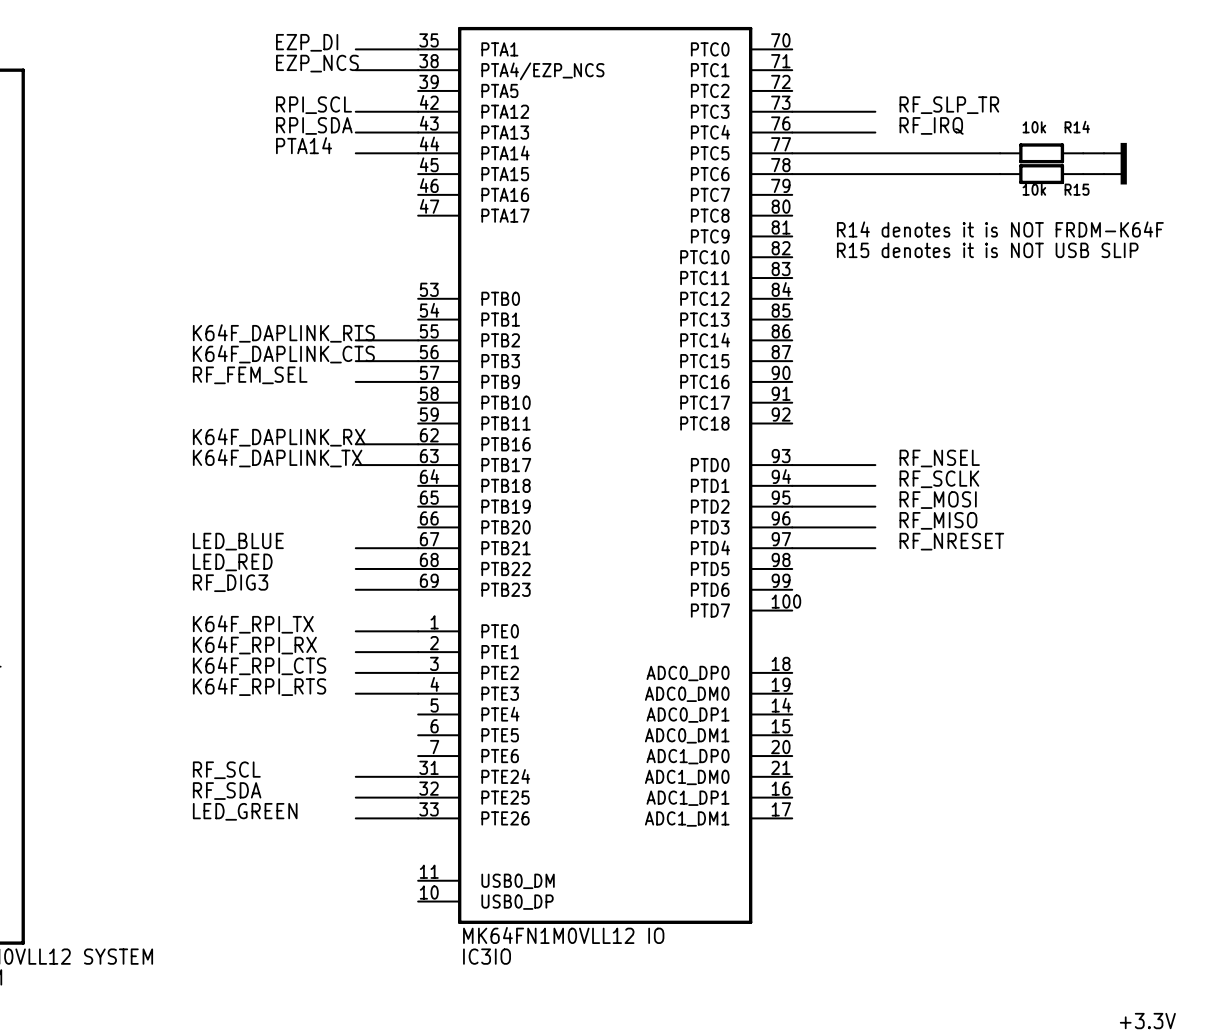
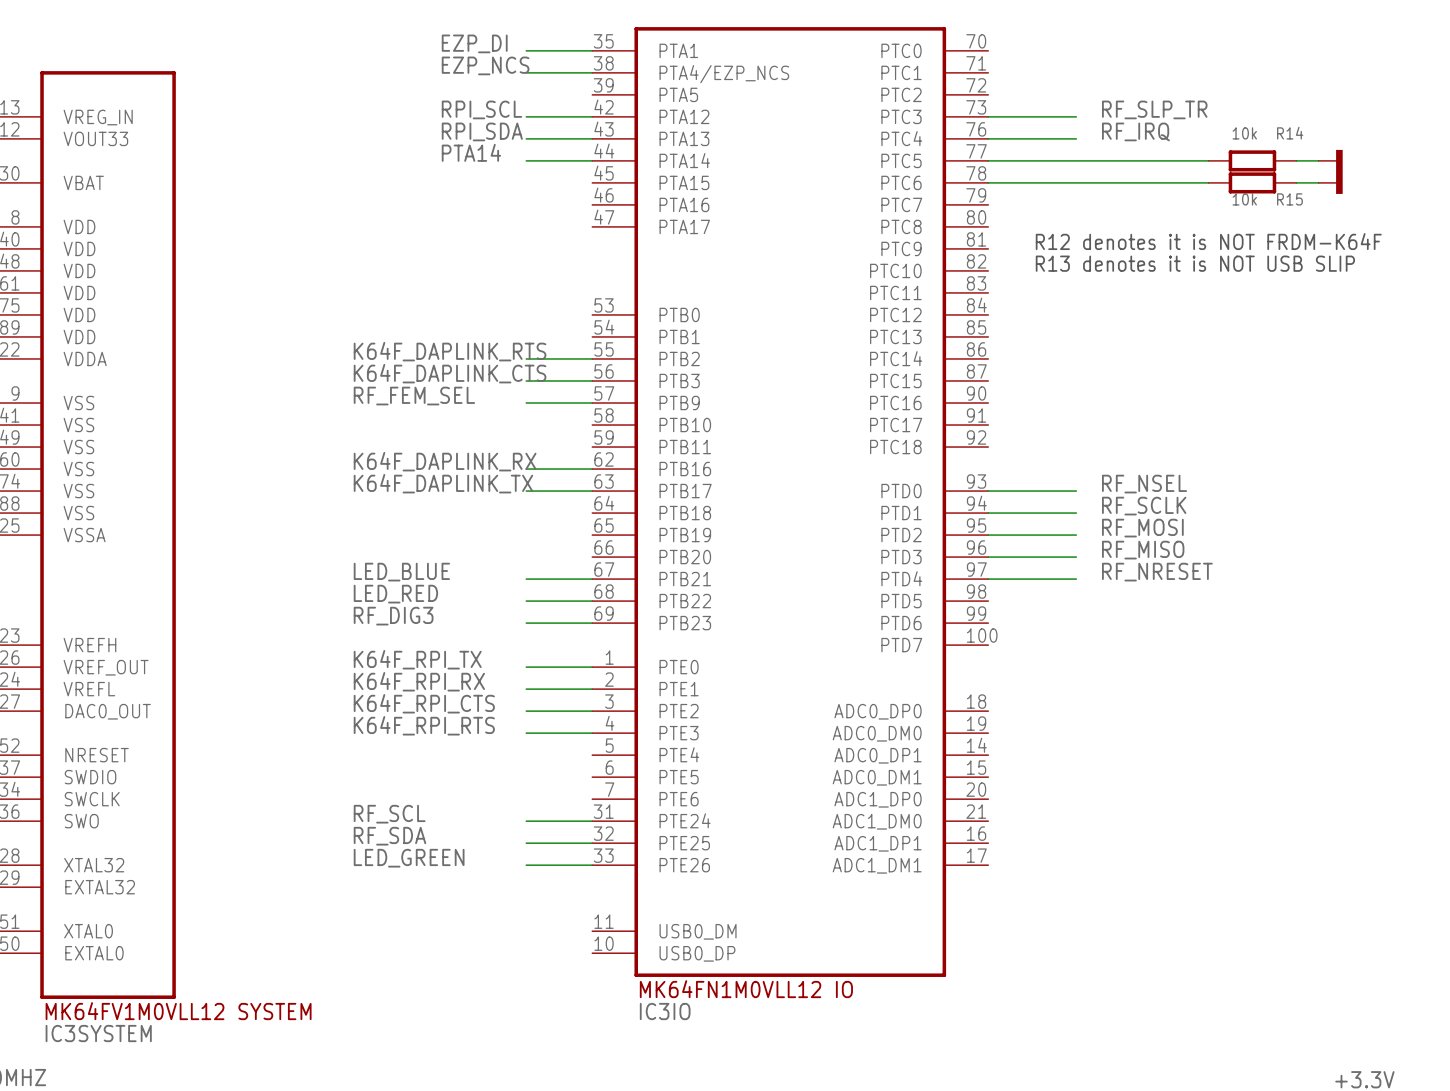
text: R14 denotes it is NOT FRDM-K64F (1000, 229) -> R12 denotes it is NOT FRDM-K64F (1208, 241)
text: R15 denotes it is NOT USB SLIP (987, 250) -> R13 denotes it is NOT USB SLIP (1195, 263)

